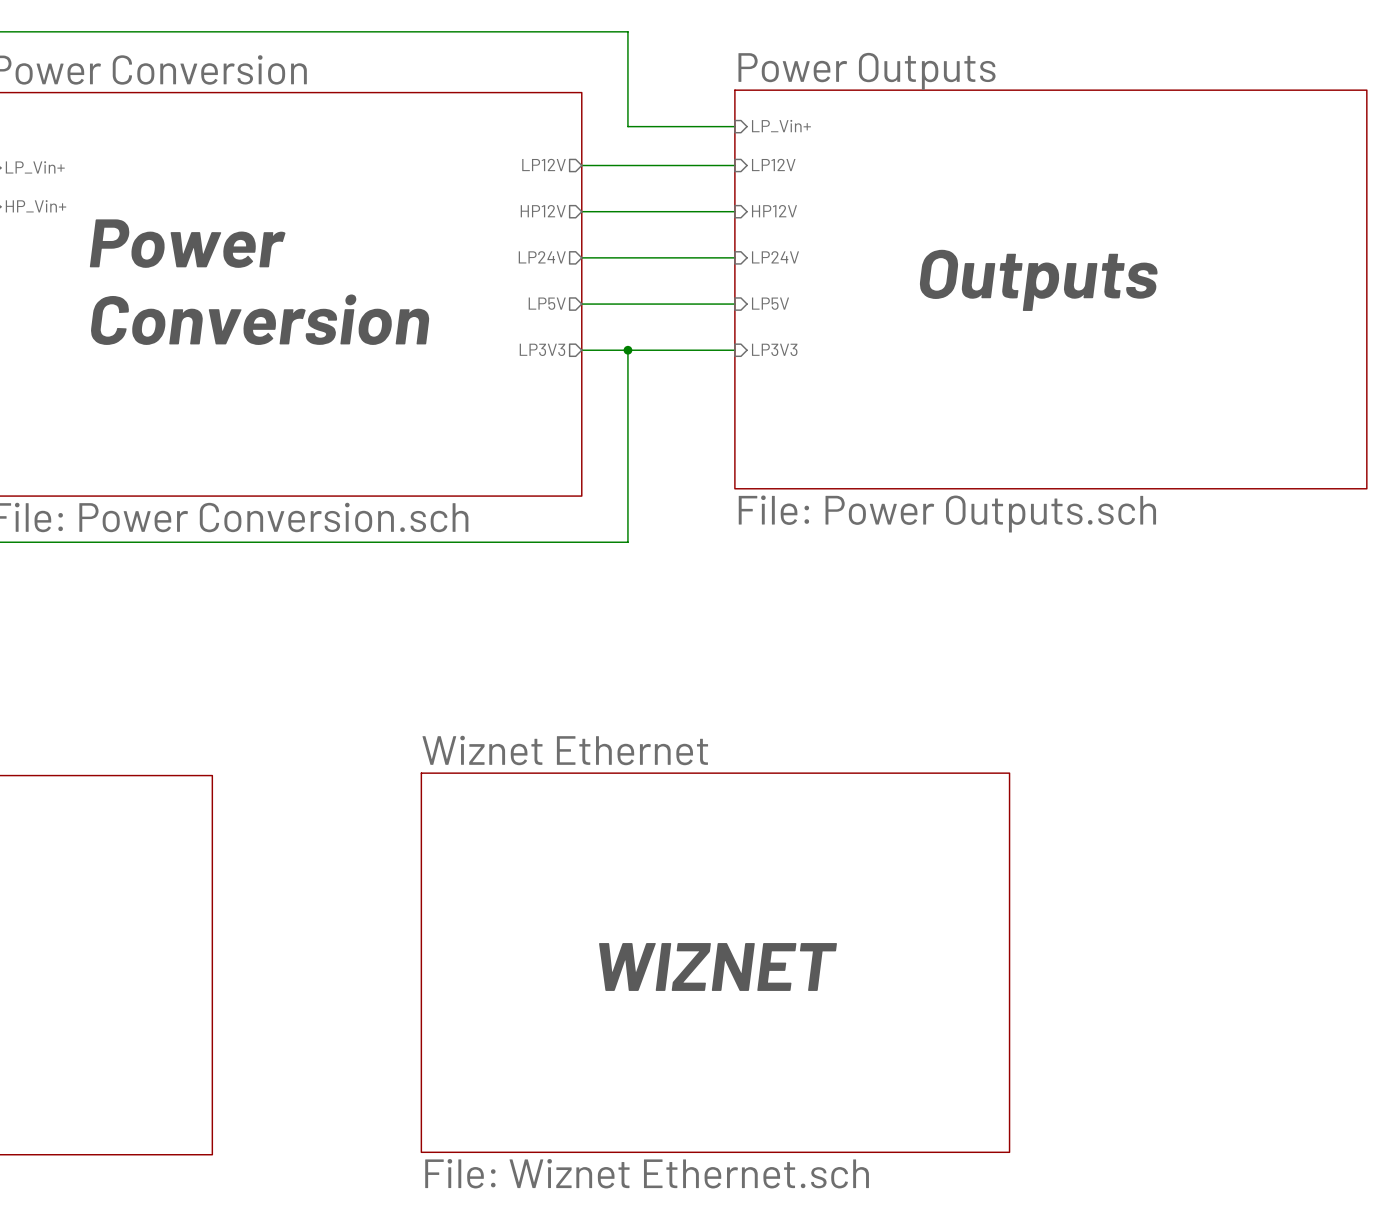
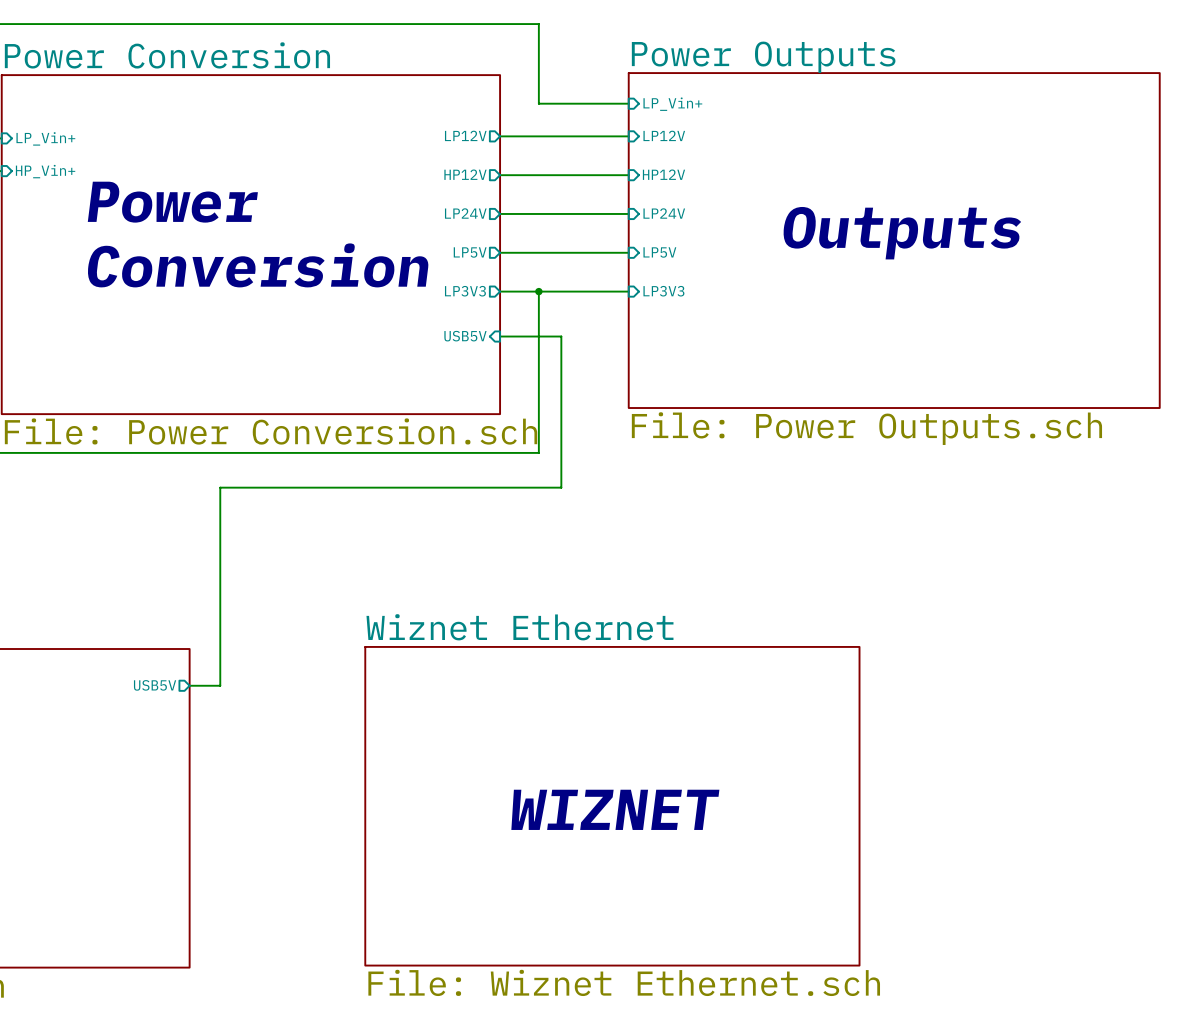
sheet pin: none -> USB5V (465, 336)
wire: none -> (500, 336) (561, 336) (561, 487) (220, 487) (220, 685) (189, 685)
sheet pin: none -> USB5V (155, 685)

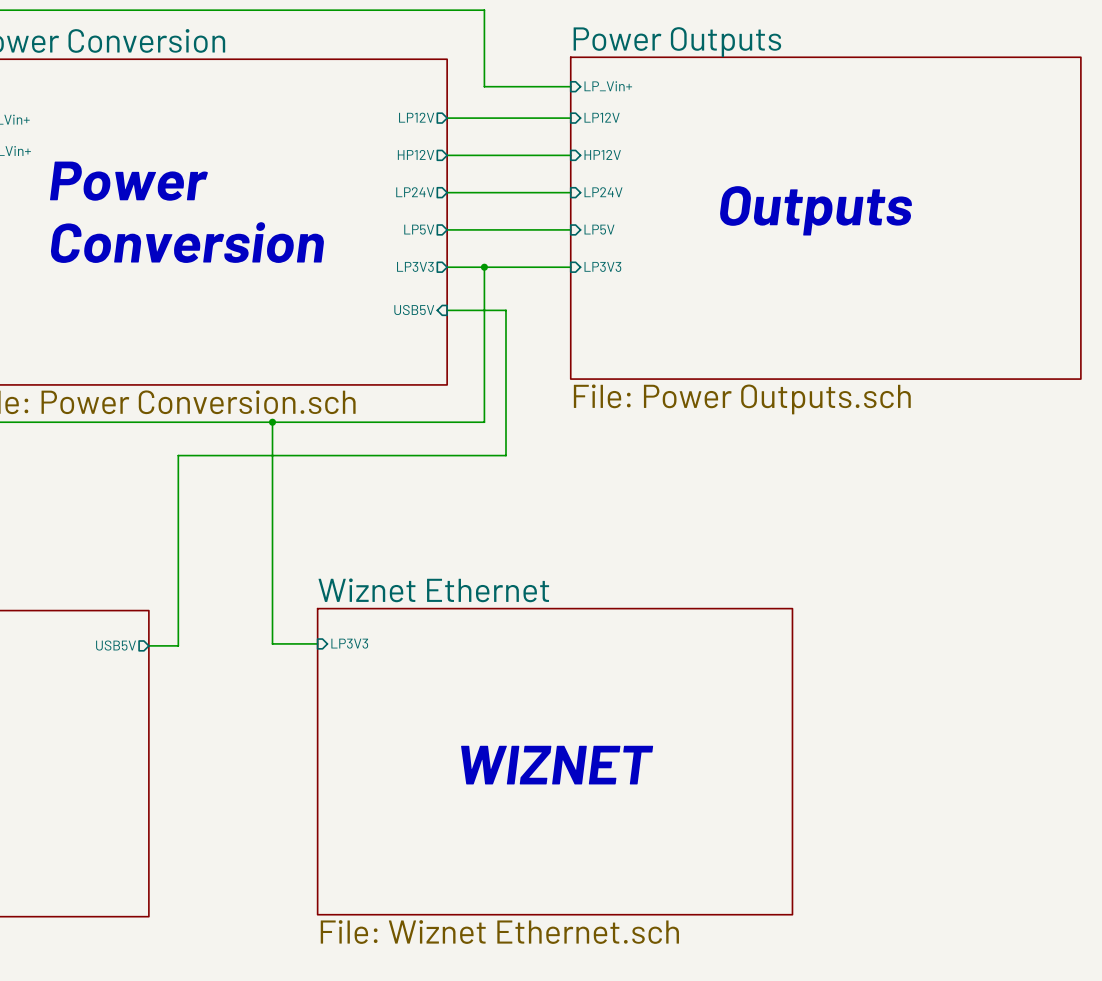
wire: none -> (272, 422) (272, 643) (317, 643)
junction: none -> (272, 422)
sheet pin: none -> LP3V3 (349, 643)

